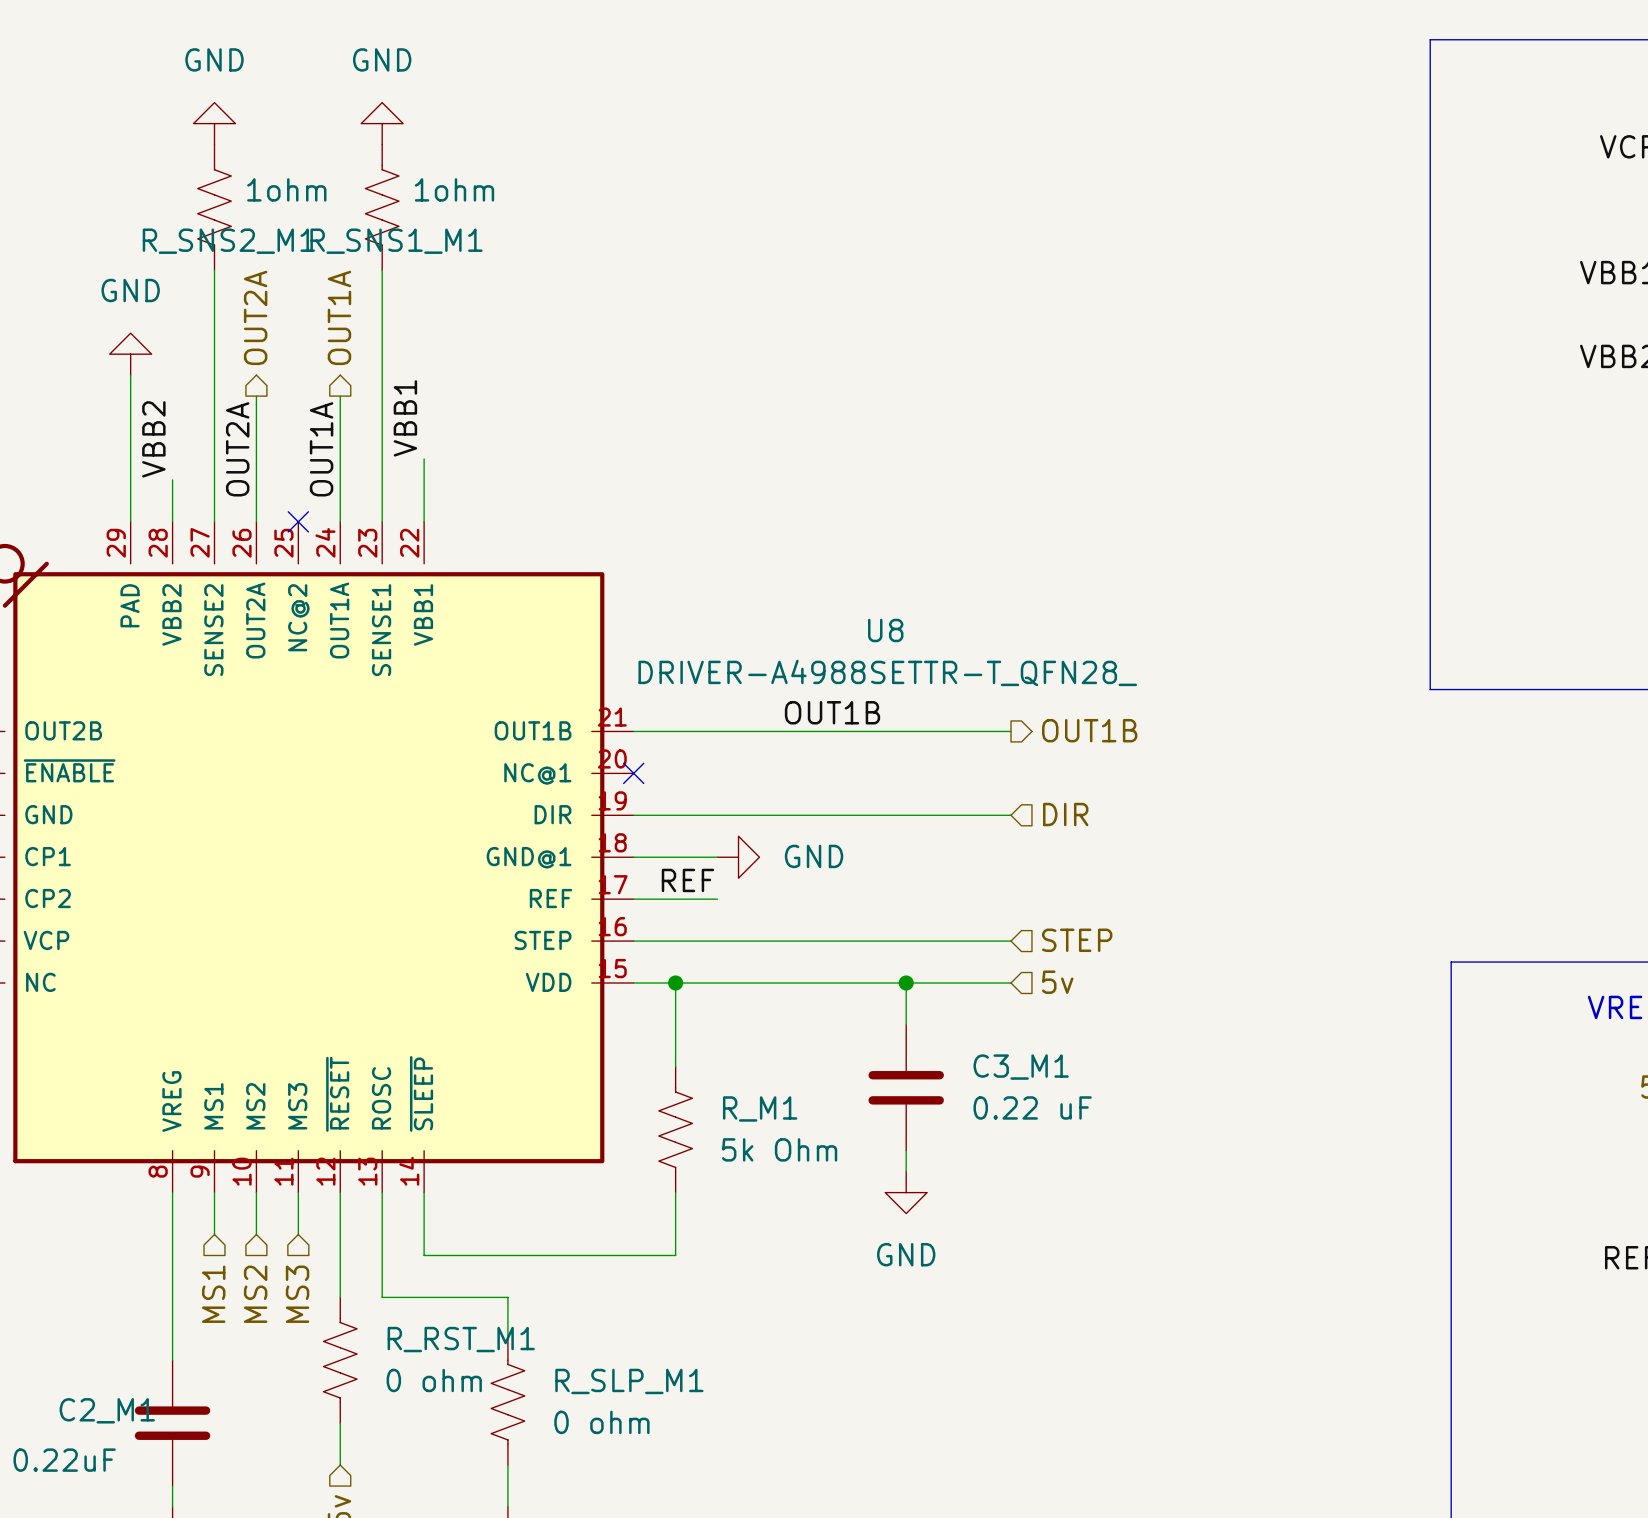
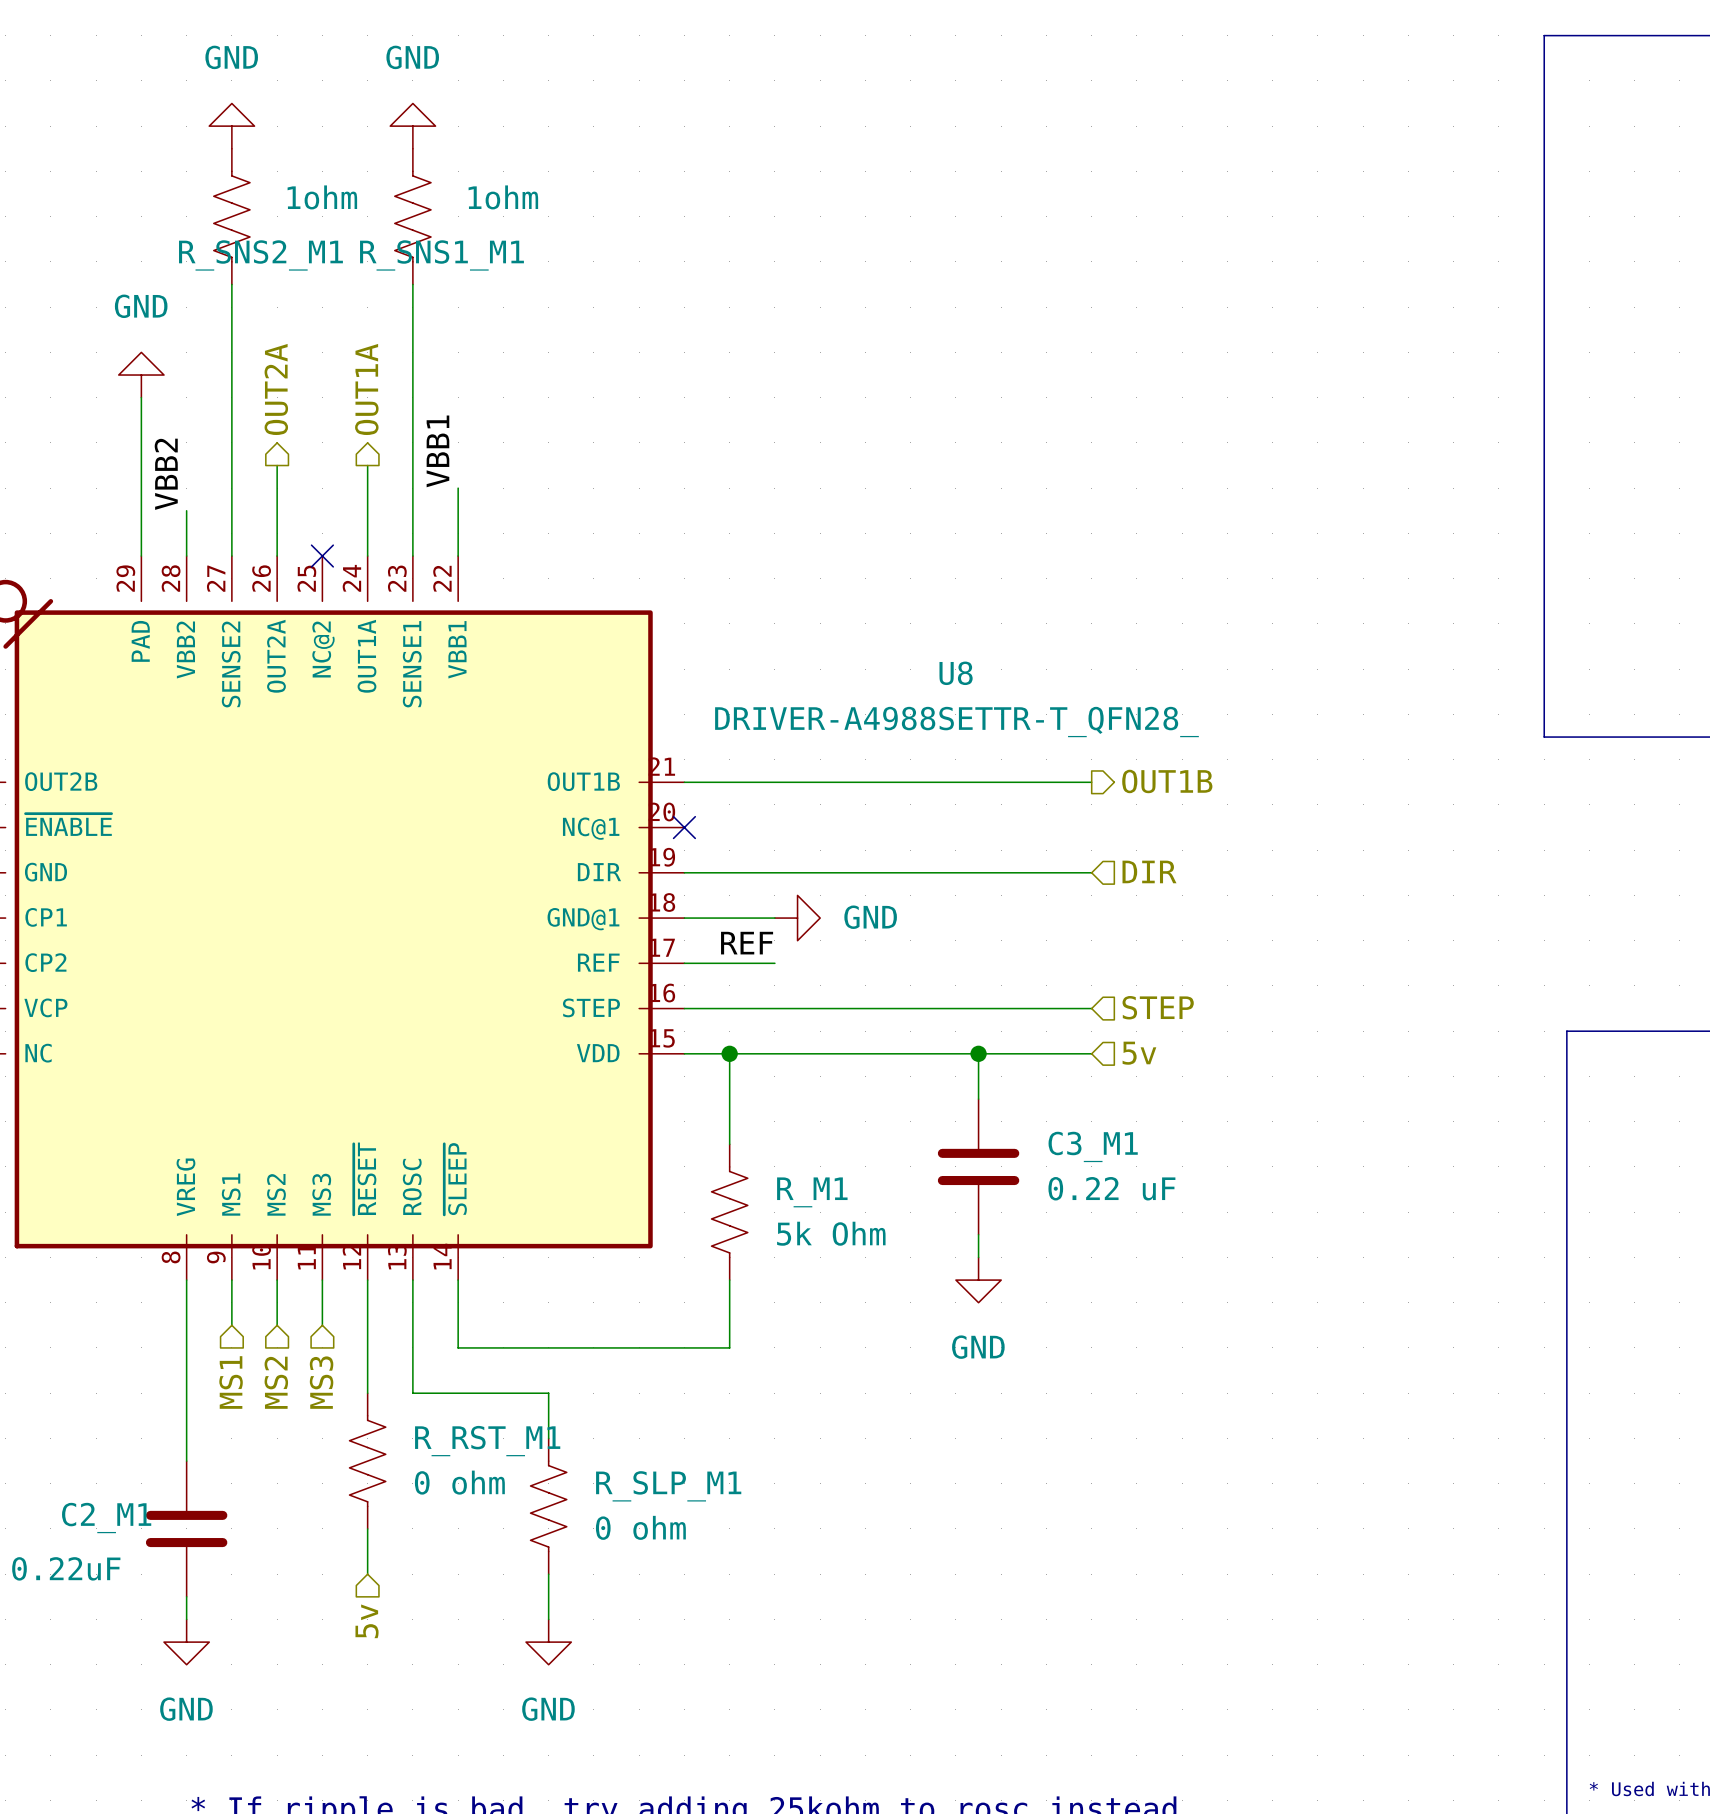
hierarchical label position: OUT2A (255, 317) -> OUT2A (276, 389)
hierarchical label position: OUT1A (339, 317) -> OUT1A (366, 389)
wire: (256, 396) (256, 438) -> none
wire: (340, 396) (340, 438) -> none
label: OUT2A (237, 449) -> none
label: OUT1A (321, 449) -> none
label: OUT1B (832, 712) -> none

